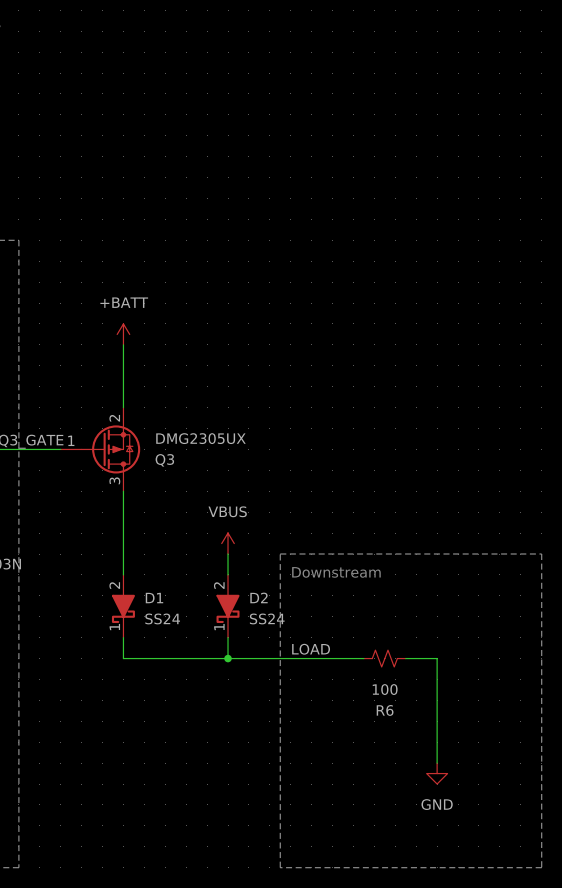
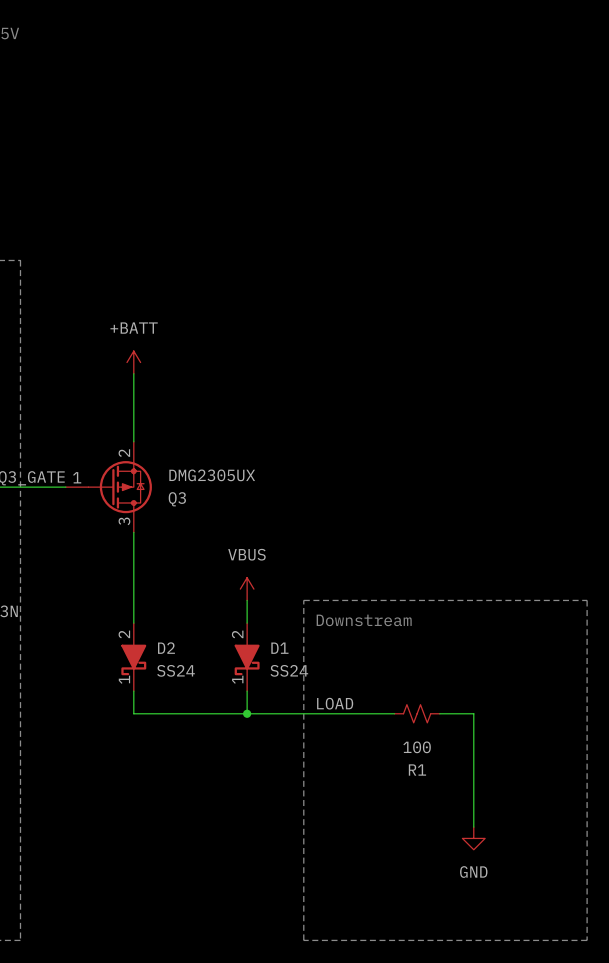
D2 name: D2 (258, 597) -> D1 (279, 648)
D1 name: D1 (154, 598) -> D2 (166, 648)
R6 name: R6 (385, 710) -> R1 (417, 770)

